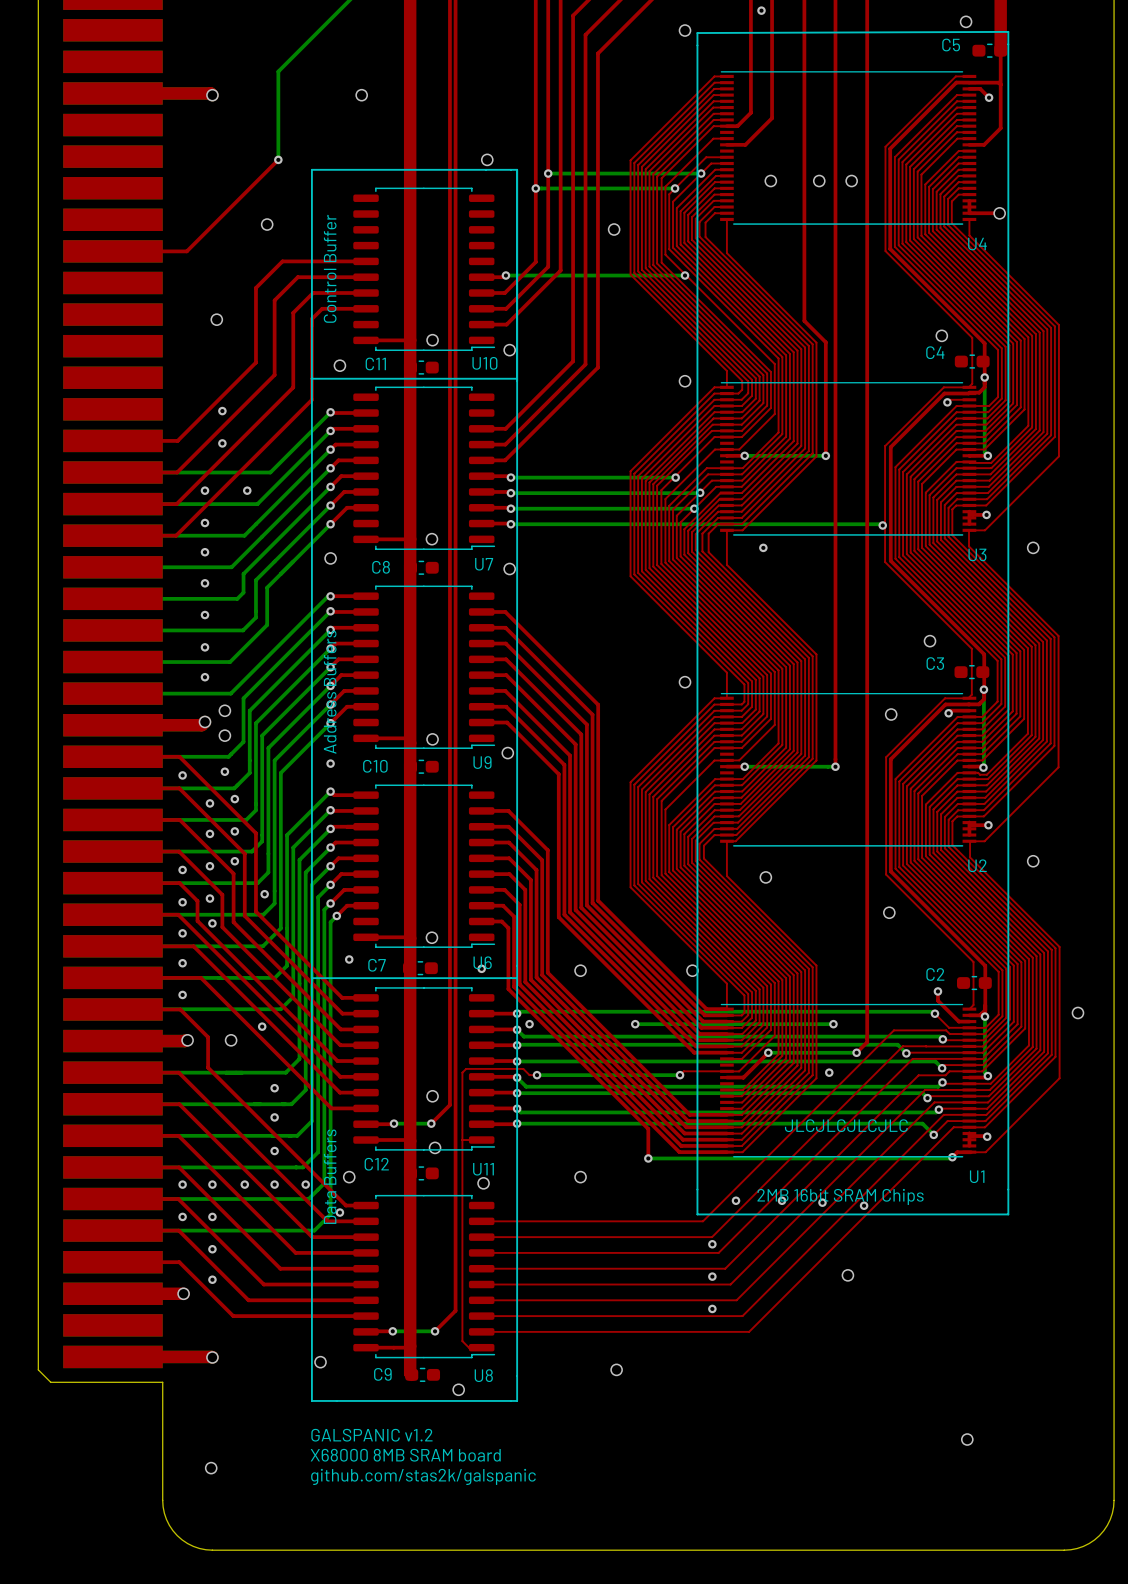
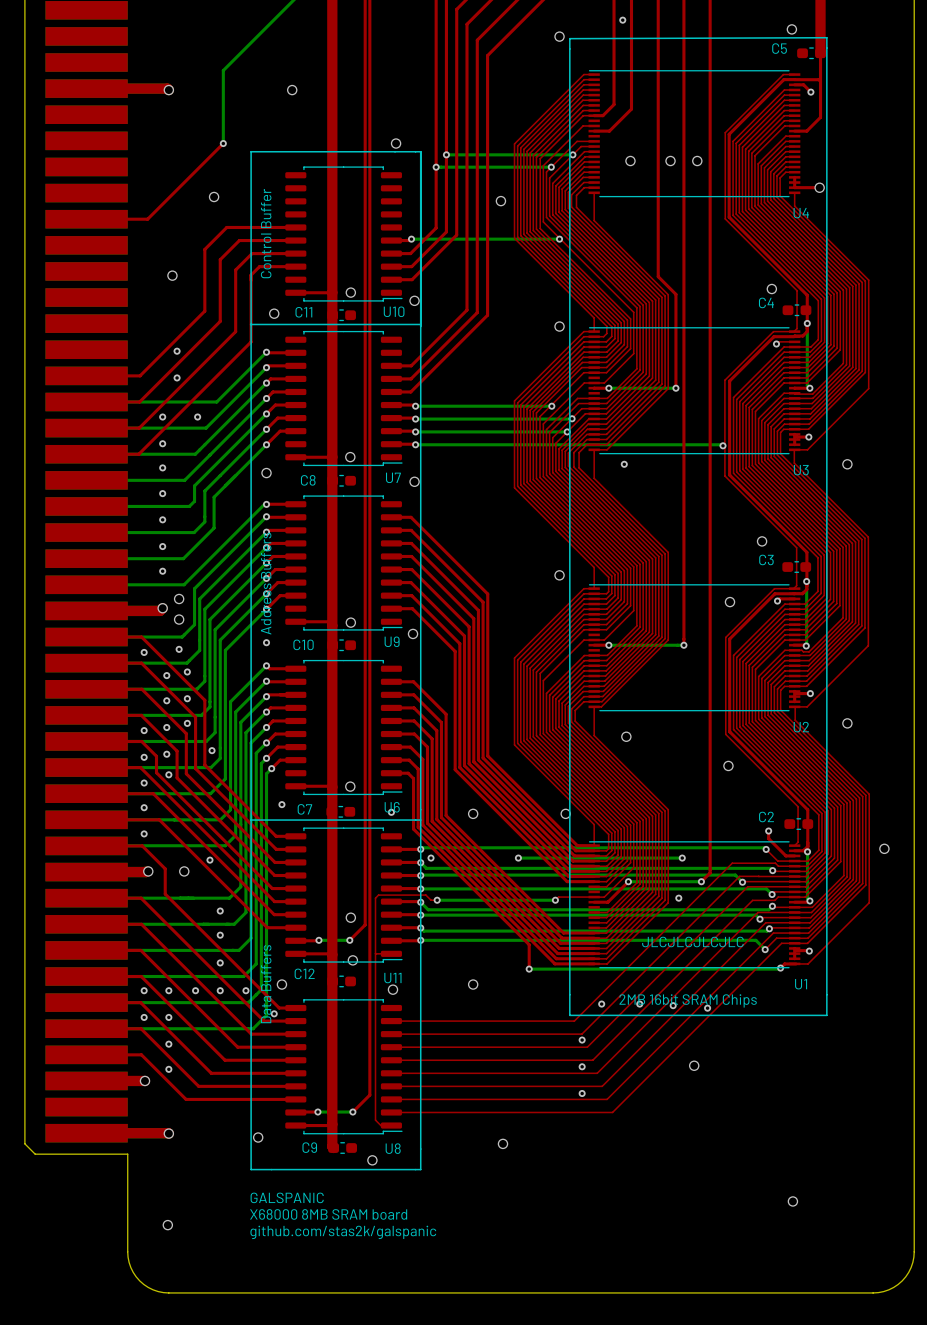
text: GALSPANIC v1.2 (371, 1435) -> GALSPANIC (287, 1197)

